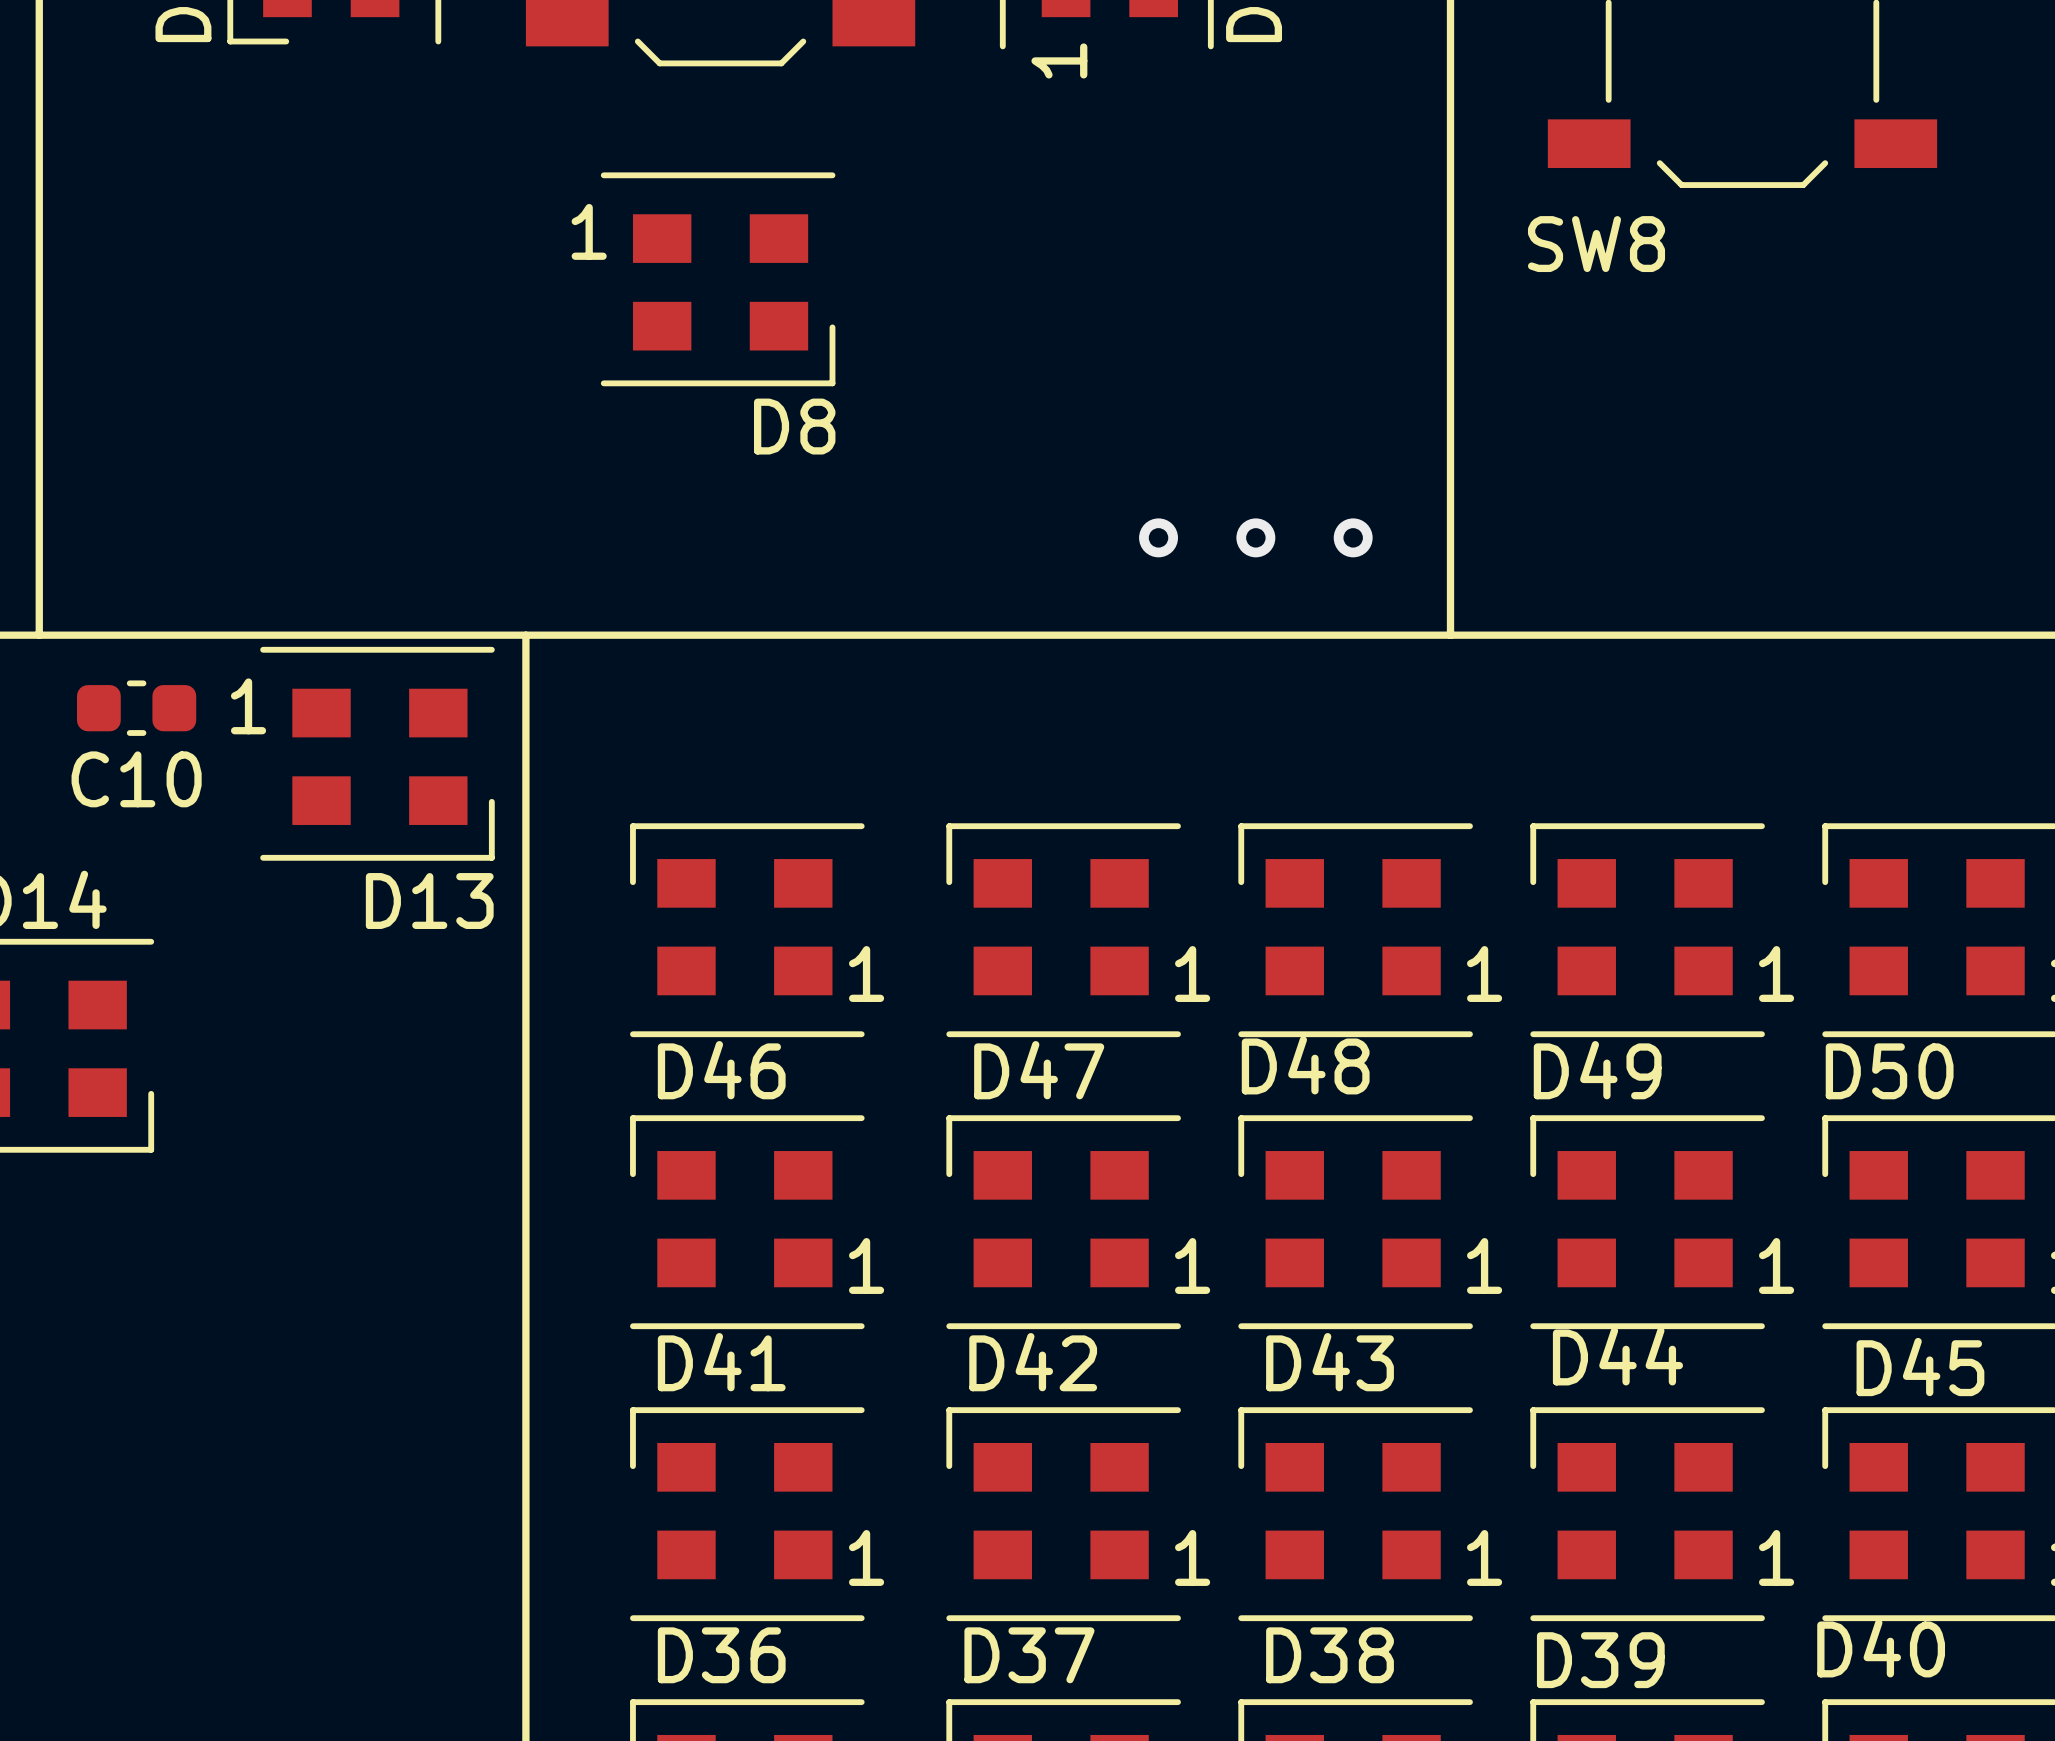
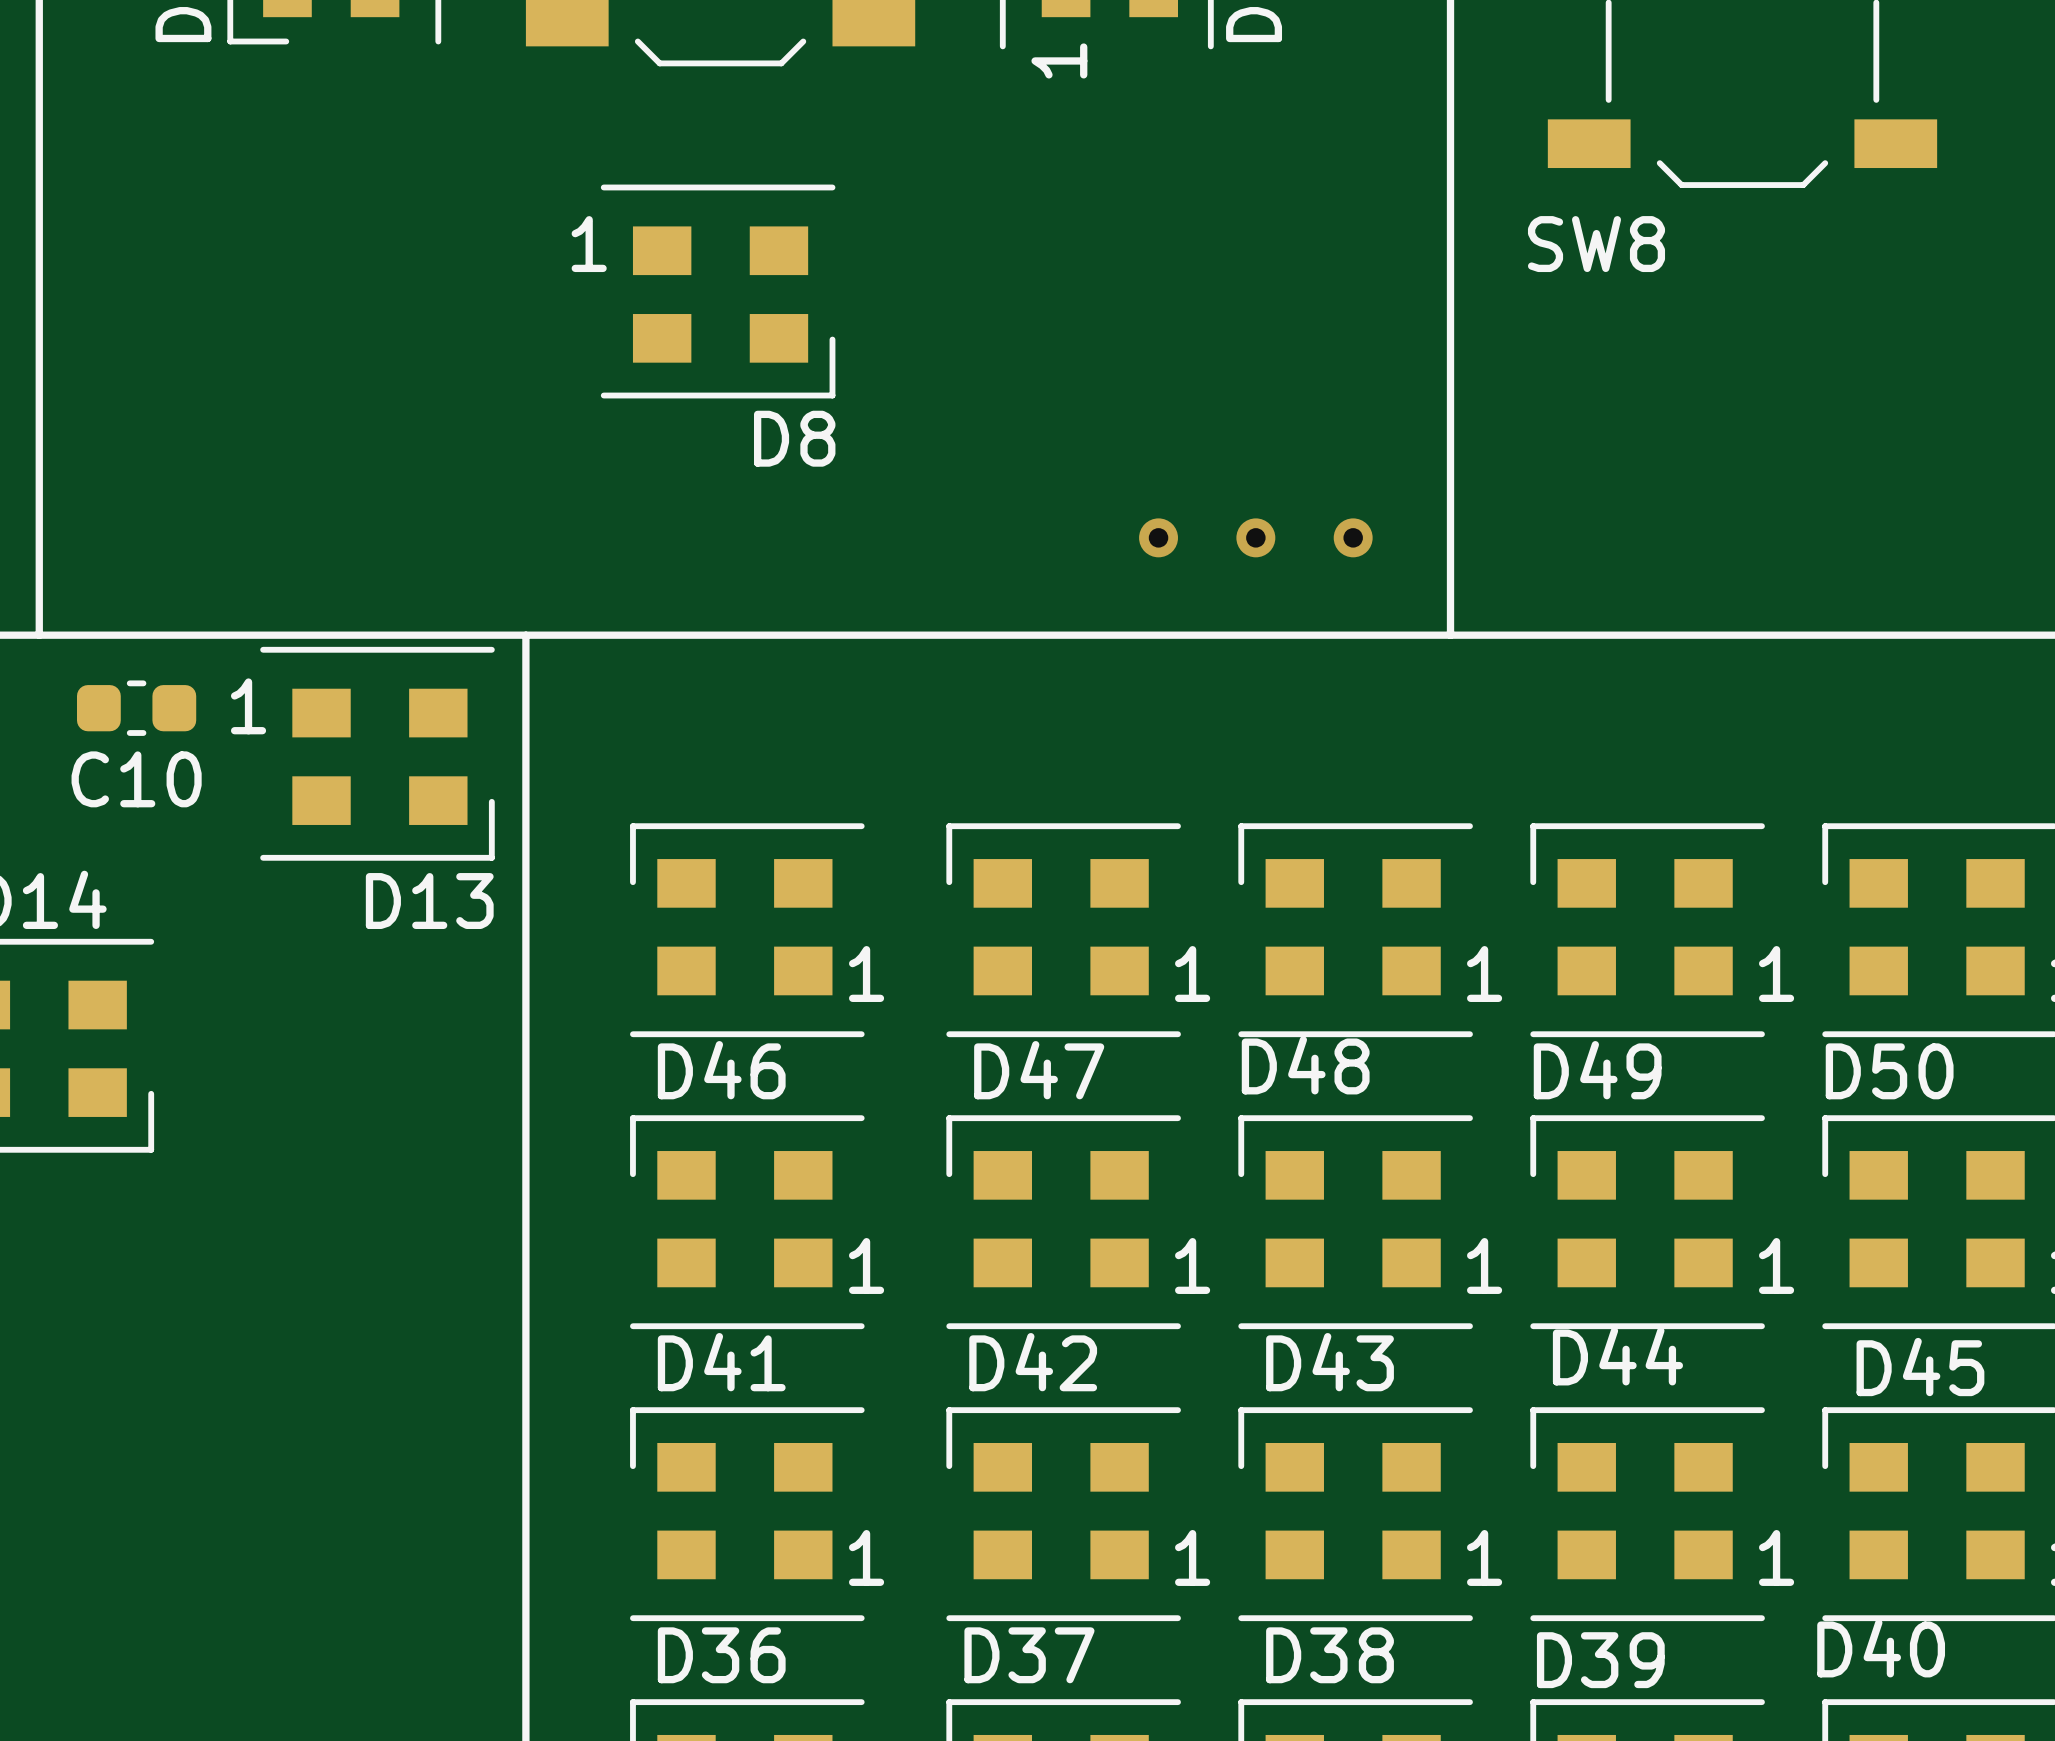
D8 position: (718, 279) -> (718, 291)

